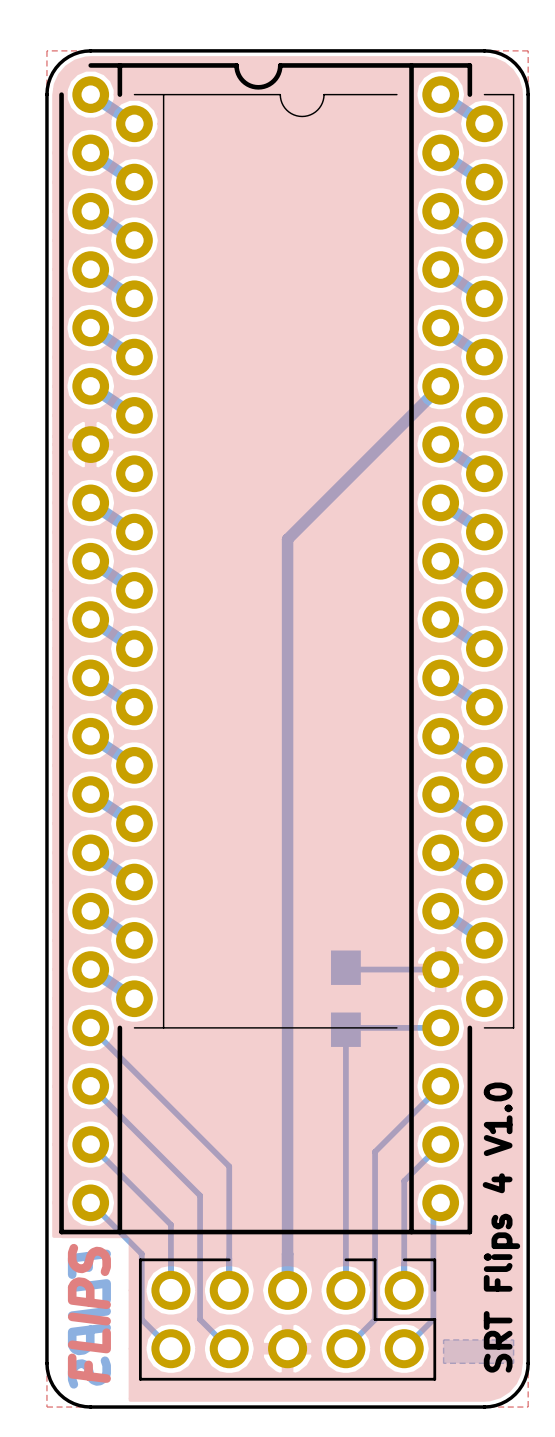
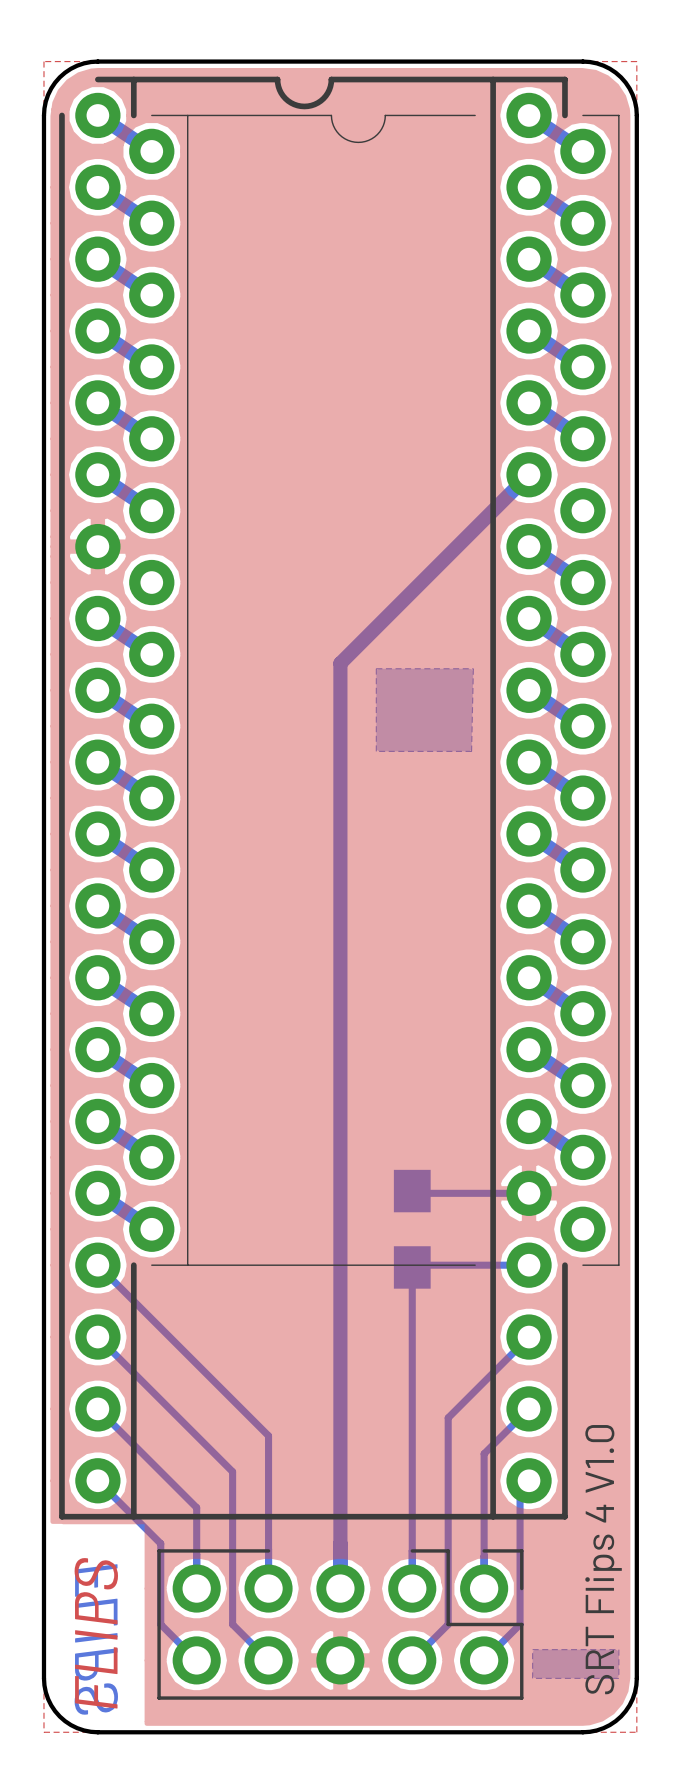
bottom zone outline: none -> (376, 668) (473, 668) (471, 751) (376, 751) (376, 668)

